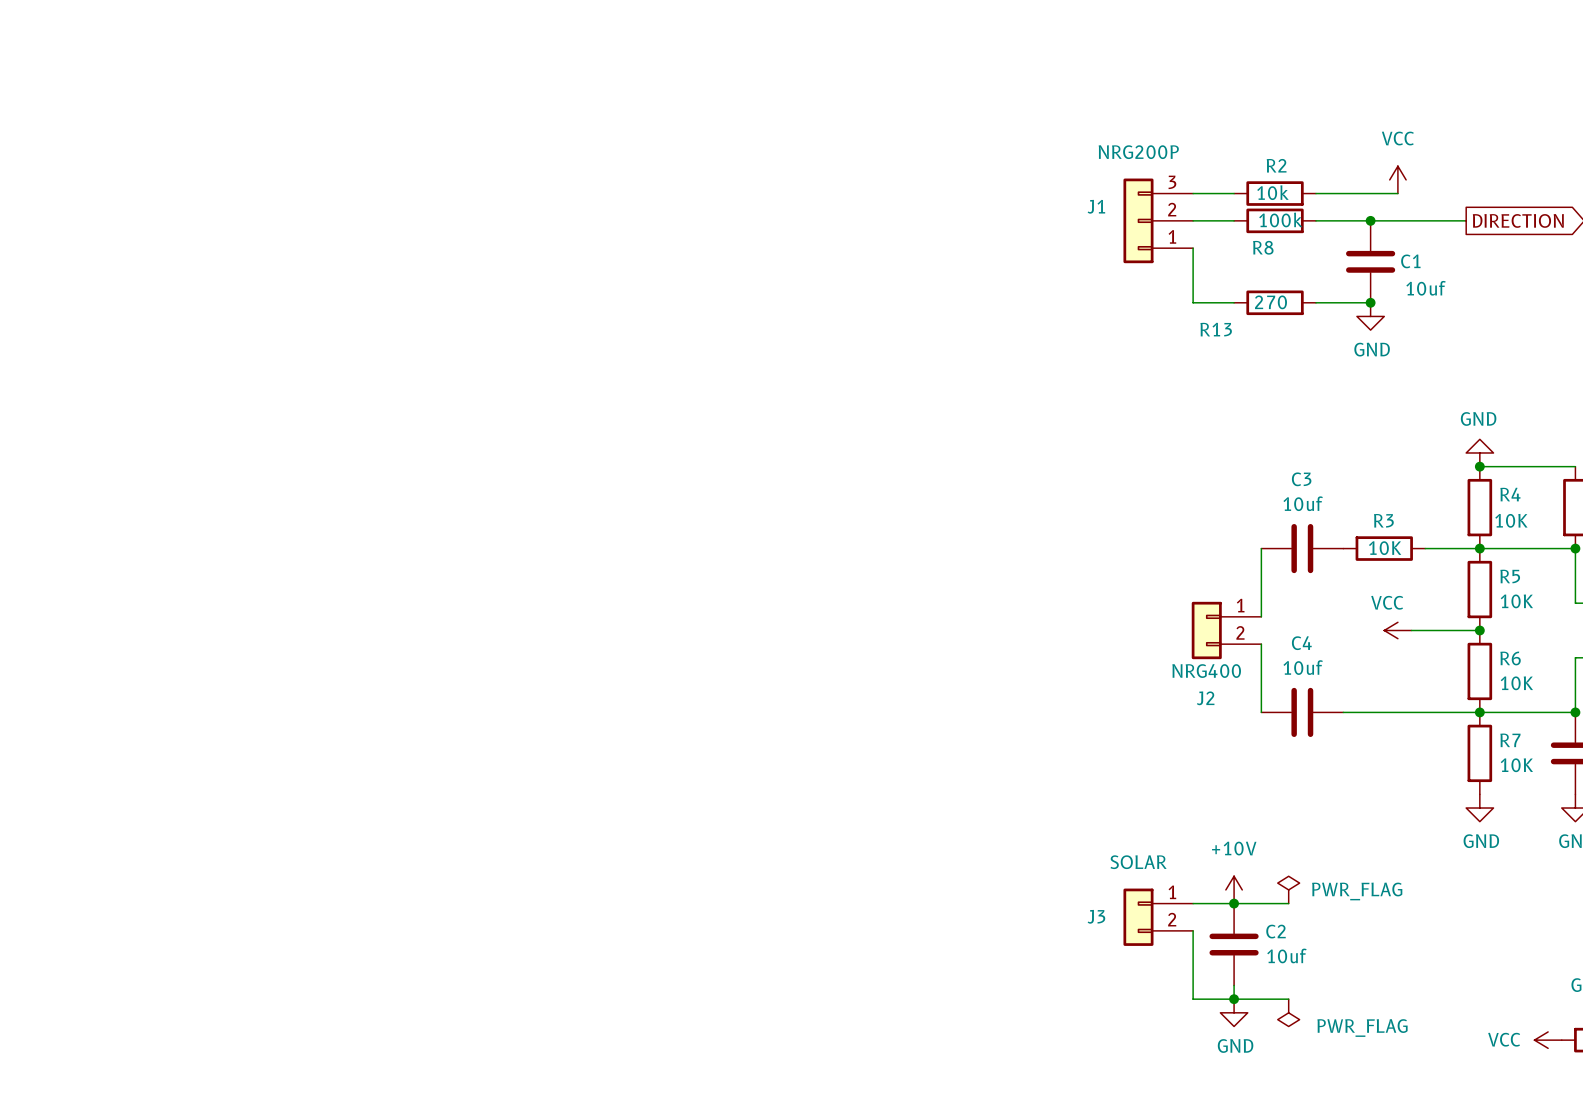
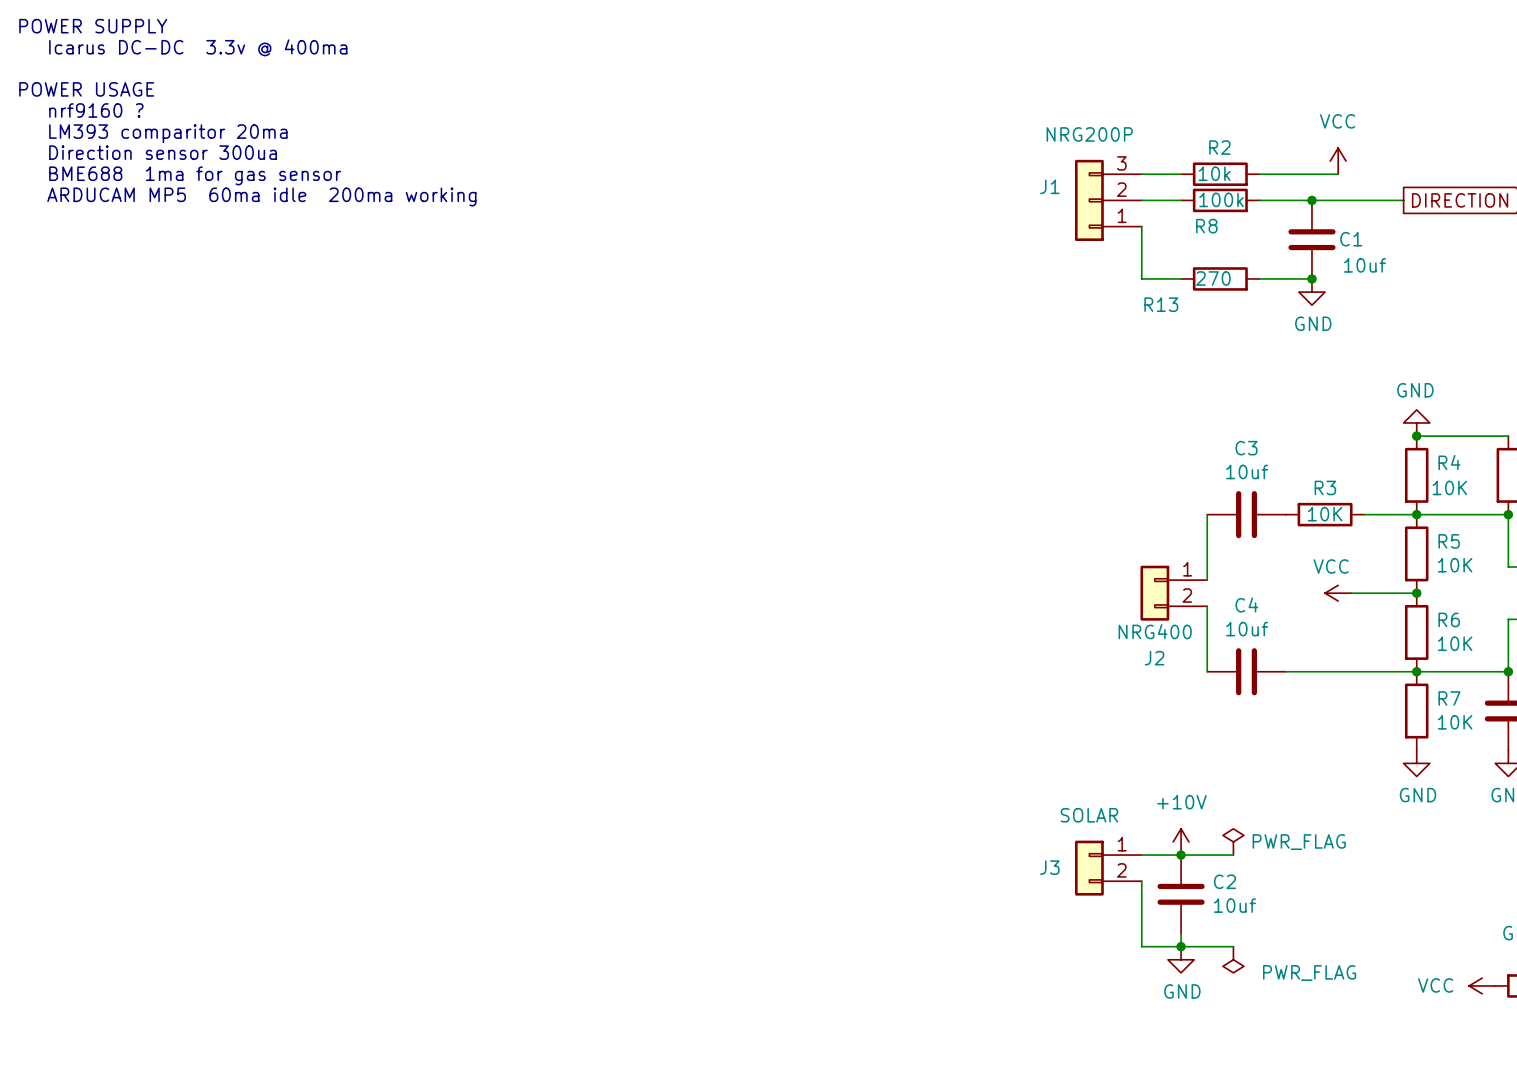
text: none -> POWER SUPPLY (93, 26)
text: none -> Icarus DC-DC 3.3v @ 400ma (198, 47)
text: none -> POWER USAGE (86, 89)
text: none -> nrf9160 ? (96, 110)
text: none -> LM393 comparitor 20ma (168, 133)
text: none -> Direction sensor 300ua (163, 152)
text: none -> BME688 1ma for gas sensor (195, 175)
text: none -> ARDUCAM MP5 60ma idle 200ma working (261, 196)

